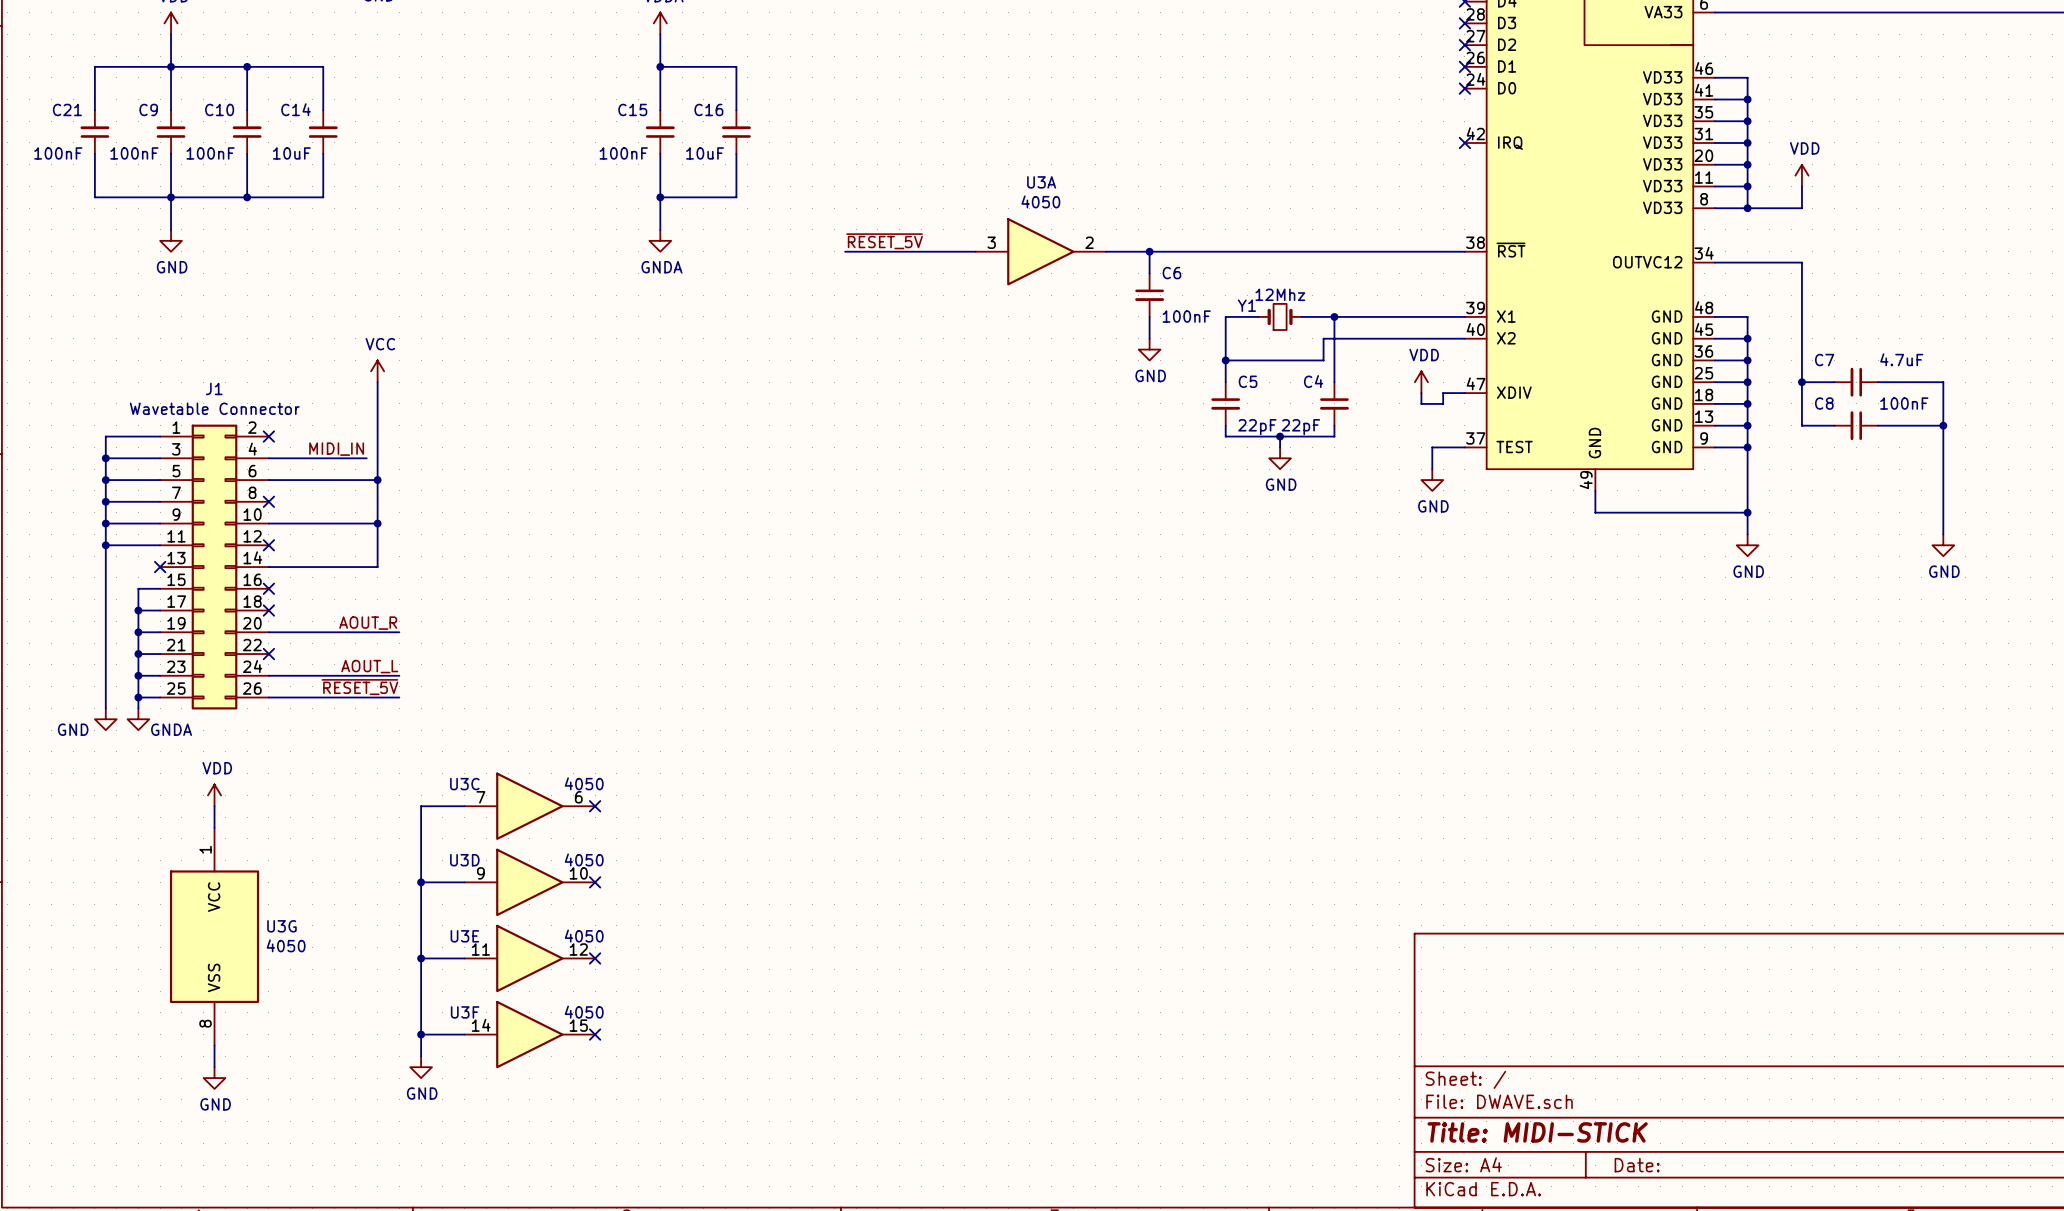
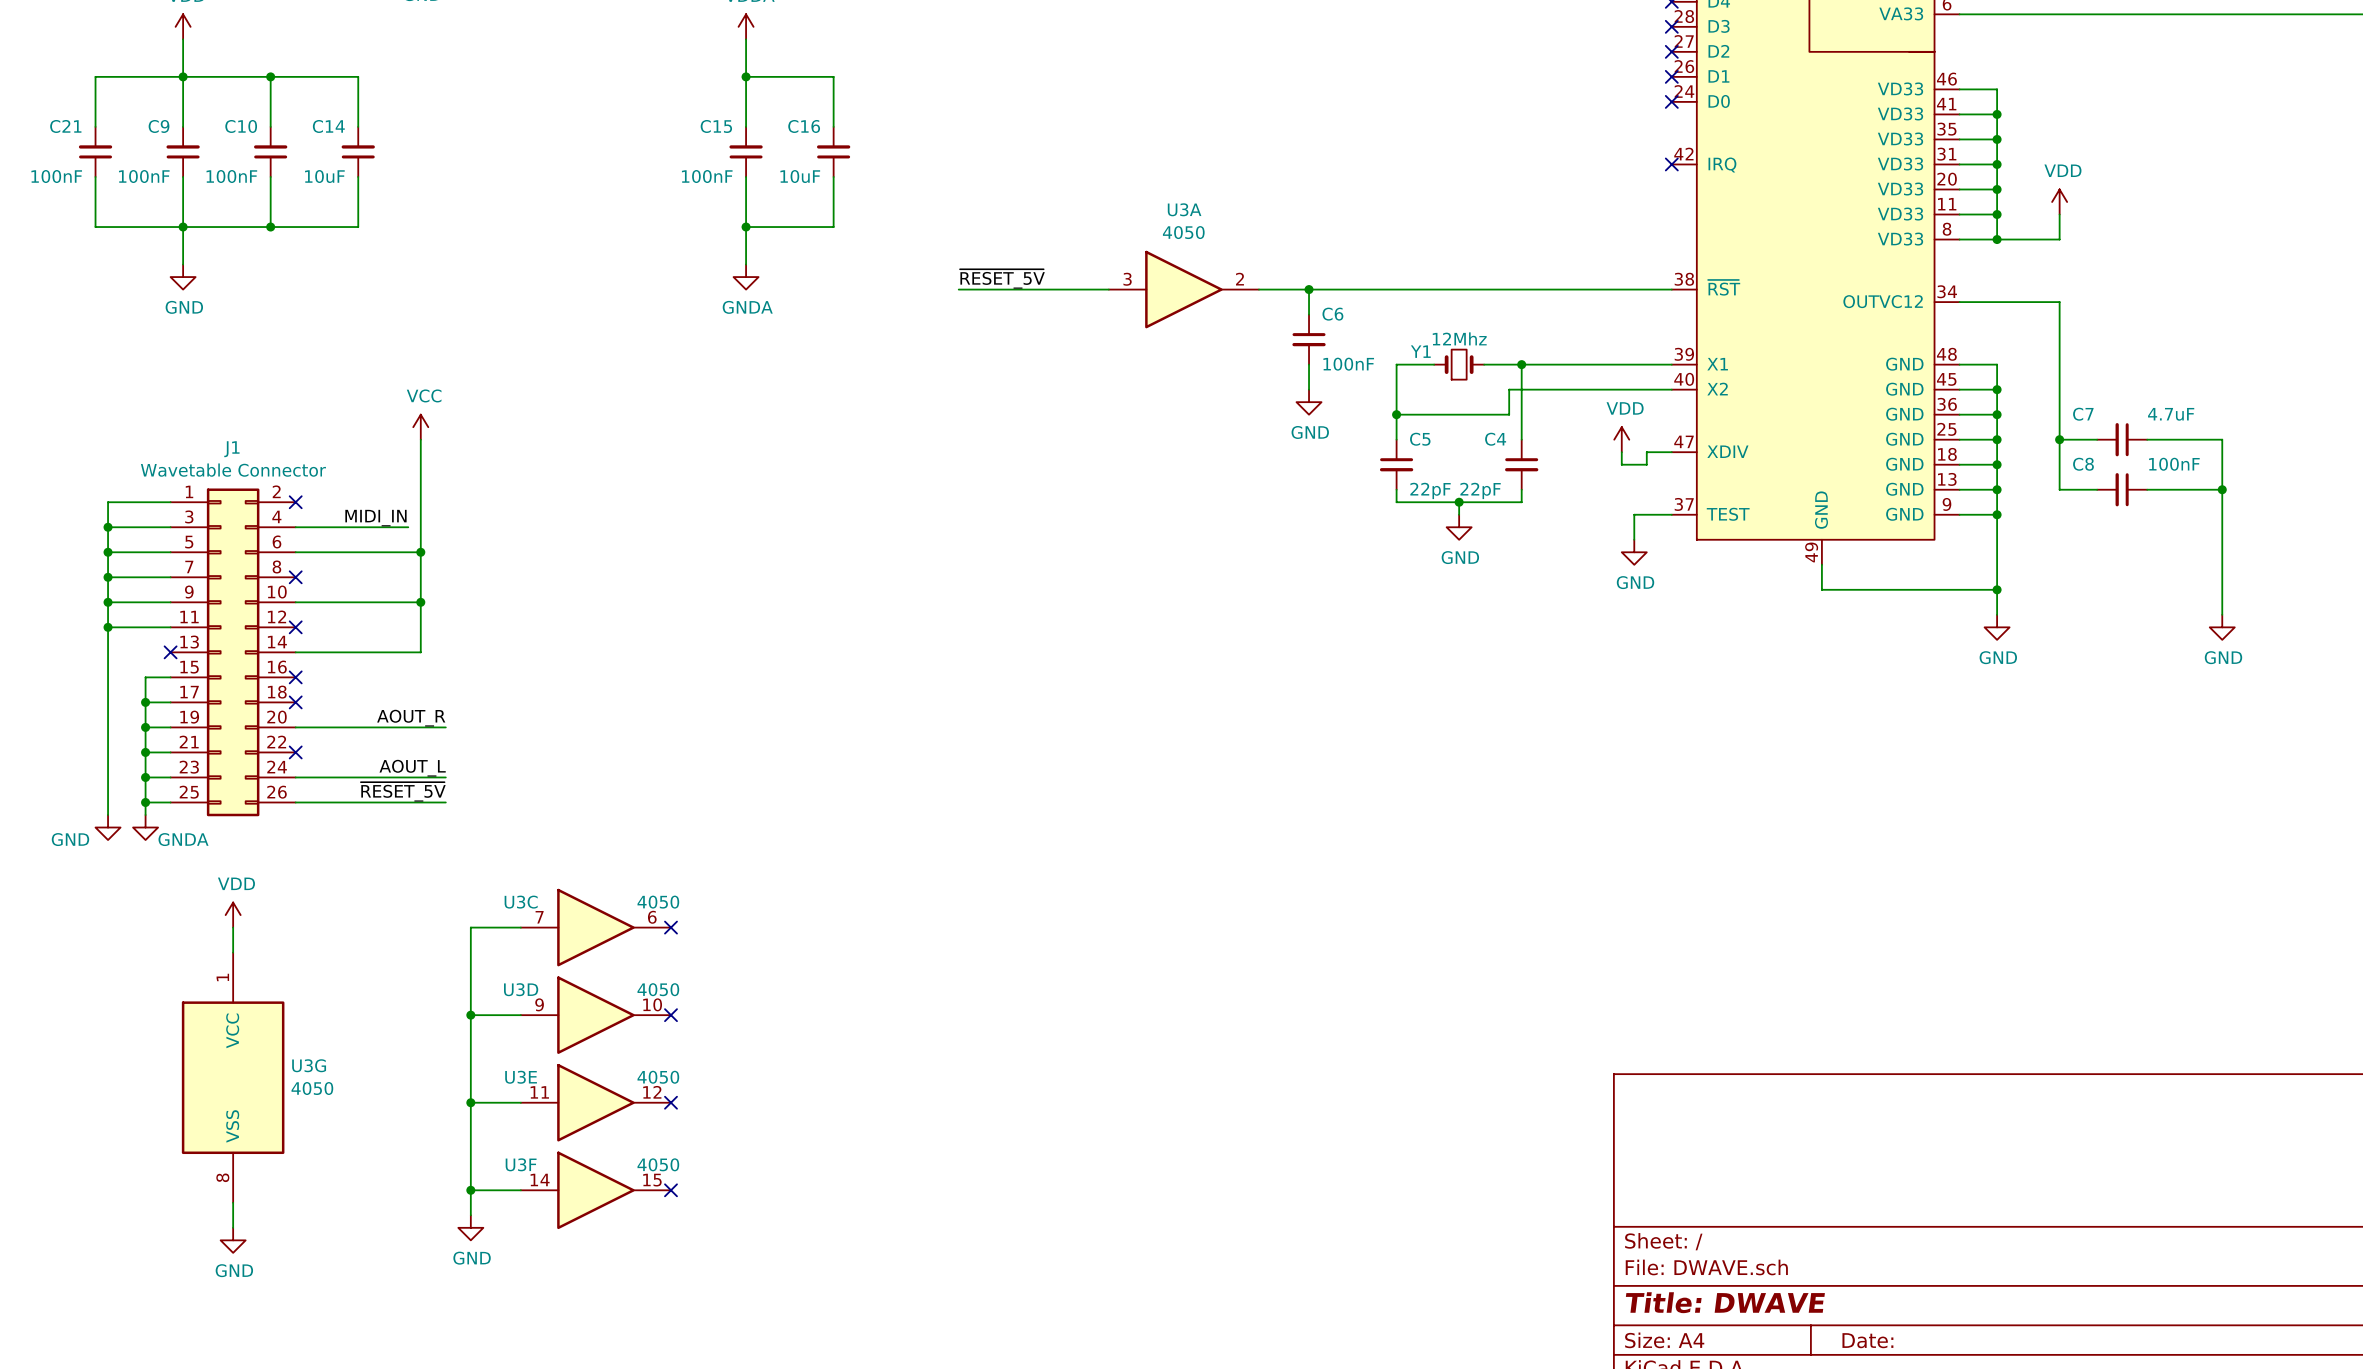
title block: Title: MIDI-STICK (1537, 1132) -> Title: DWAVE (1725, 1302)

